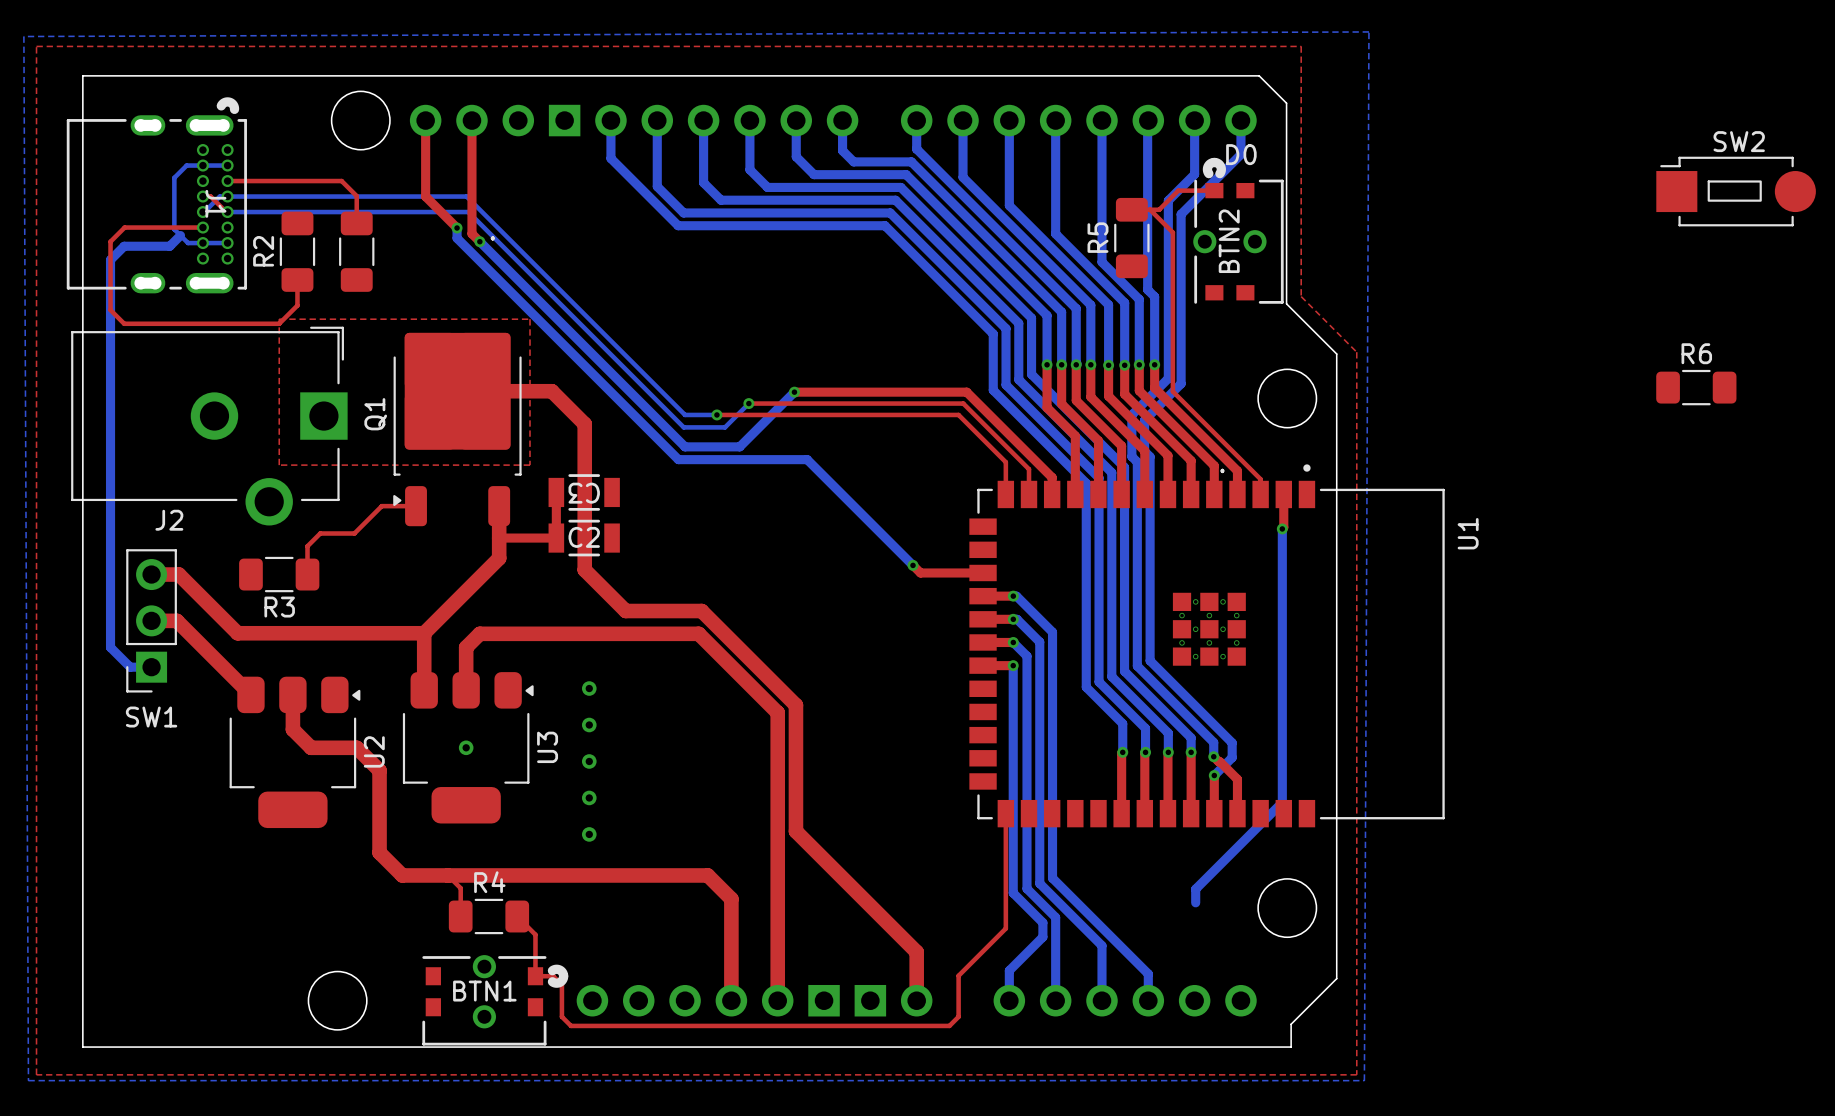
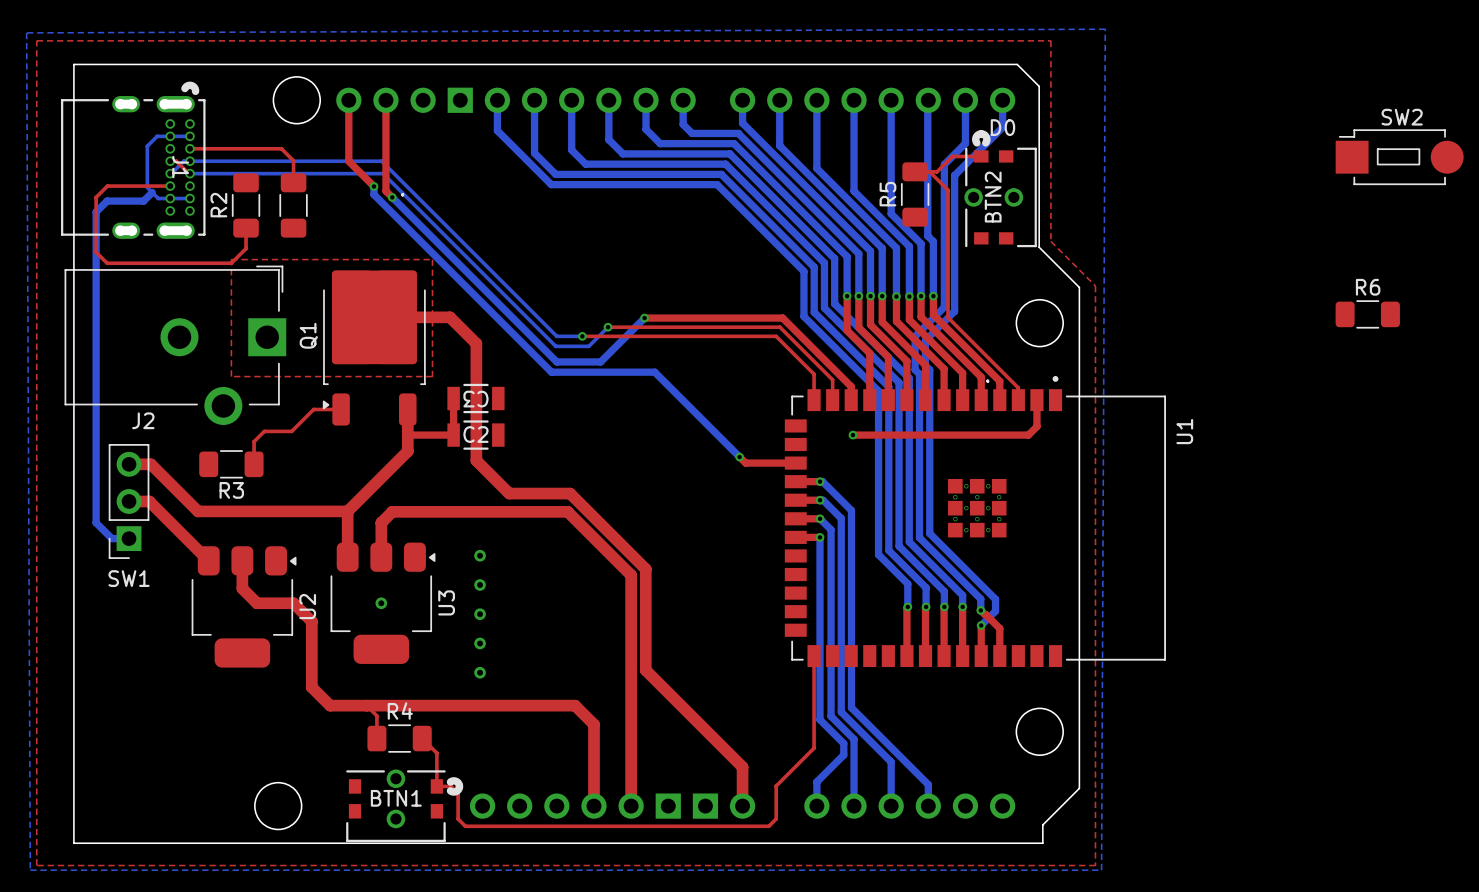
top track: none -> (1035, 427) (1028, 435) (852, 435)
bottom track: (1282, 528) (1282, 802) (1195, 889) (1195, 902) -> none
via: (1282, 528) -> none
via: none -> (852, 435)

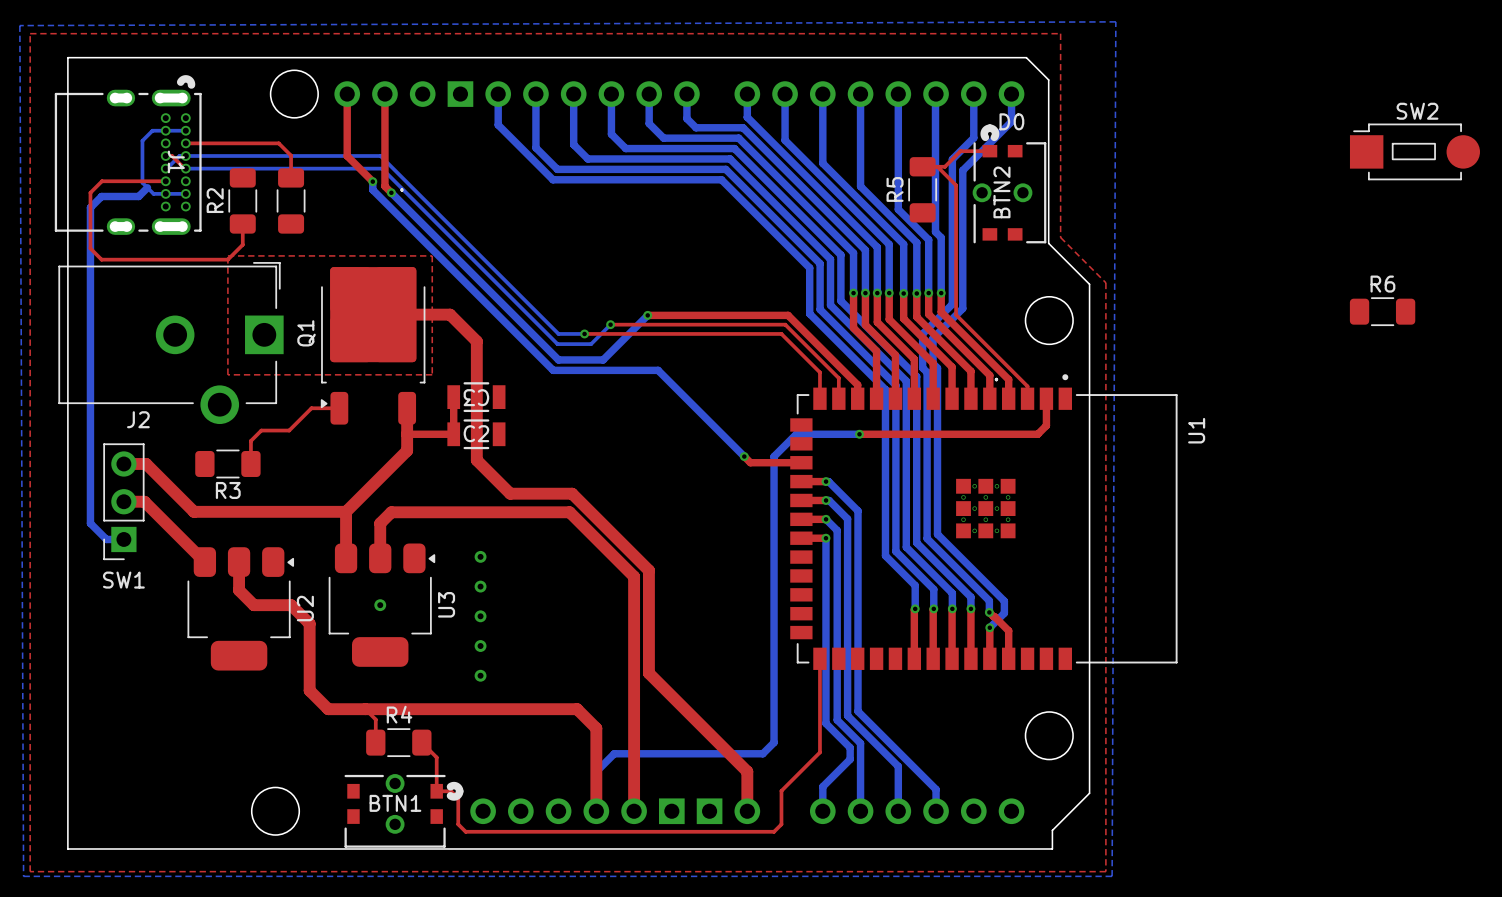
bottom track: none -> (859, 434) (796, 434) (774, 456) (774, 742) (762, 753) (614, 753) (596, 771) (596, 811)

